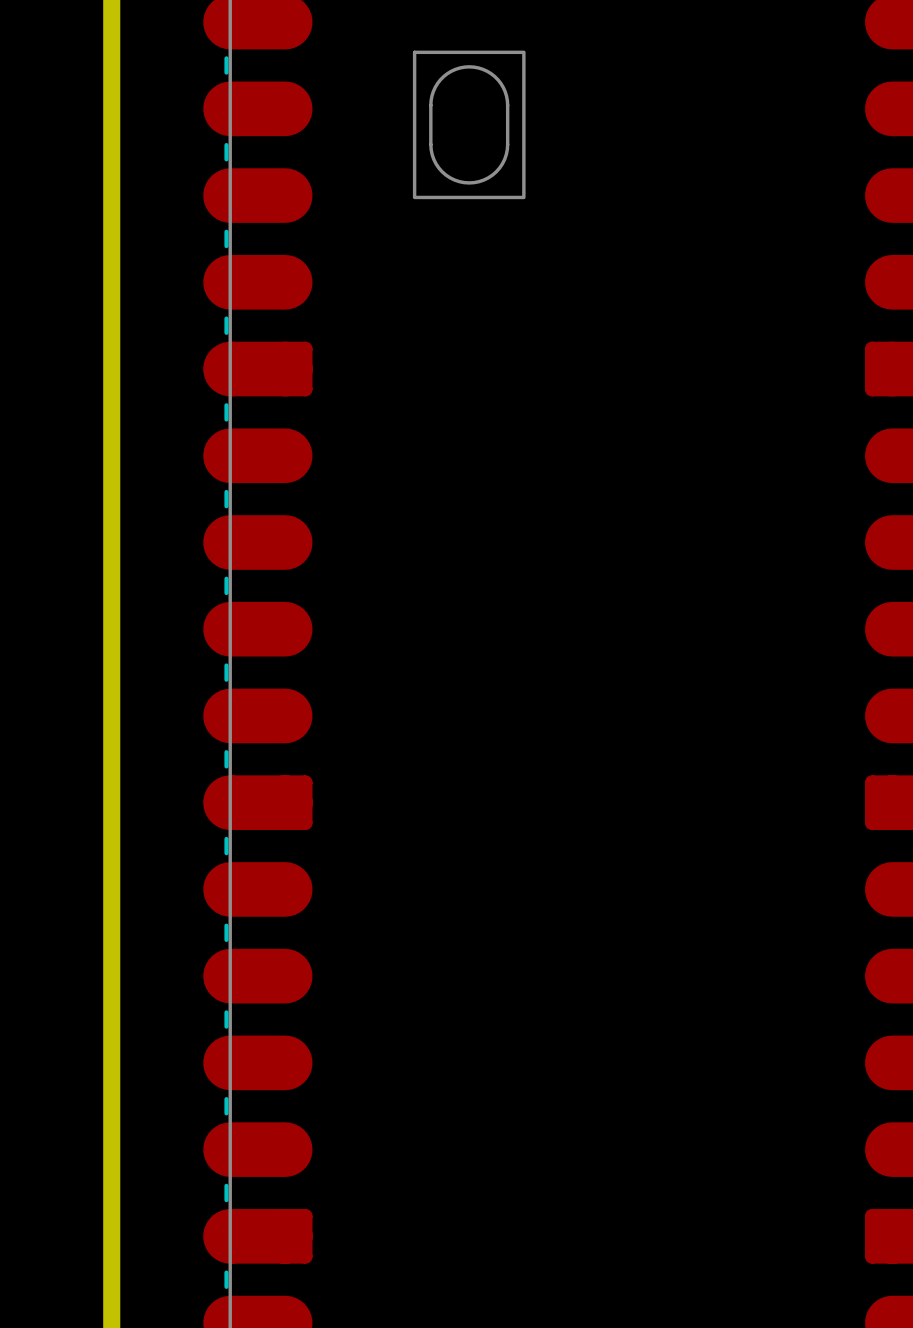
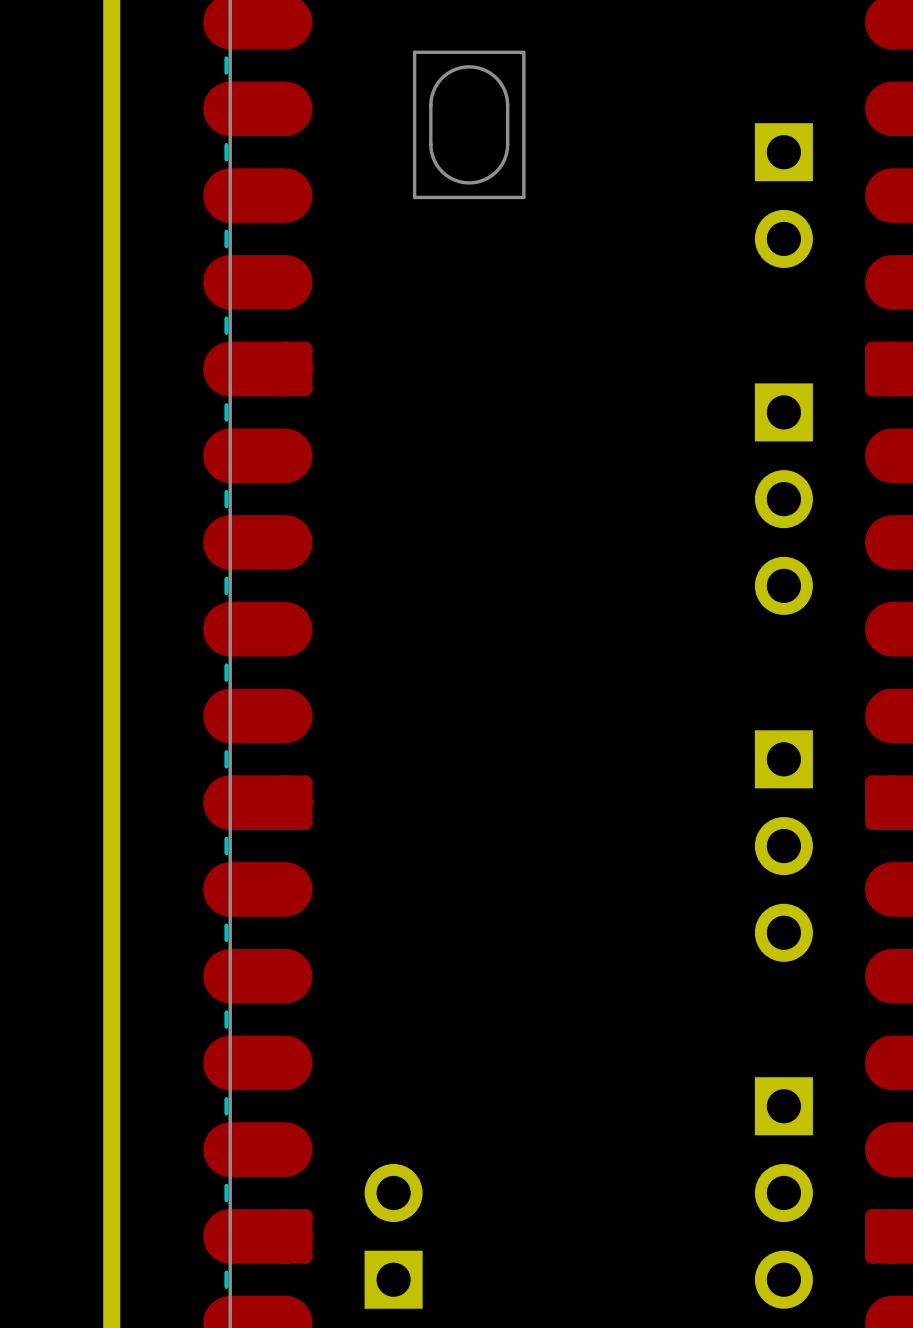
part: none -> (783, 195)
part: none -> (783, 499)
part: none -> (783, 846)
part: none -> (783, 1192)
part: none -> (393, 1236)

